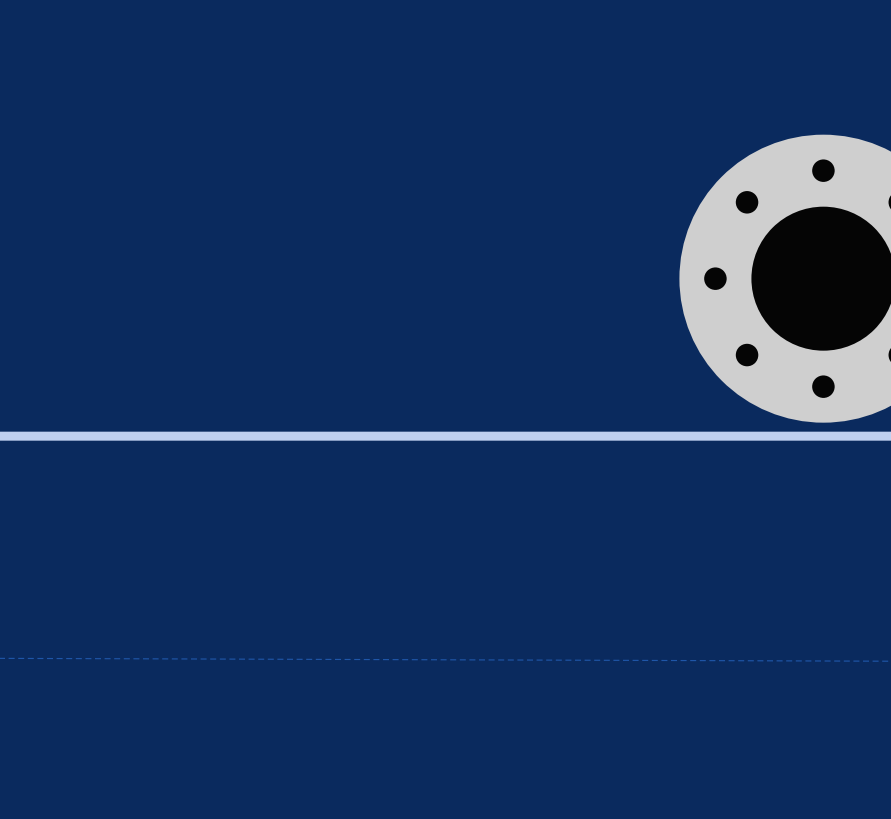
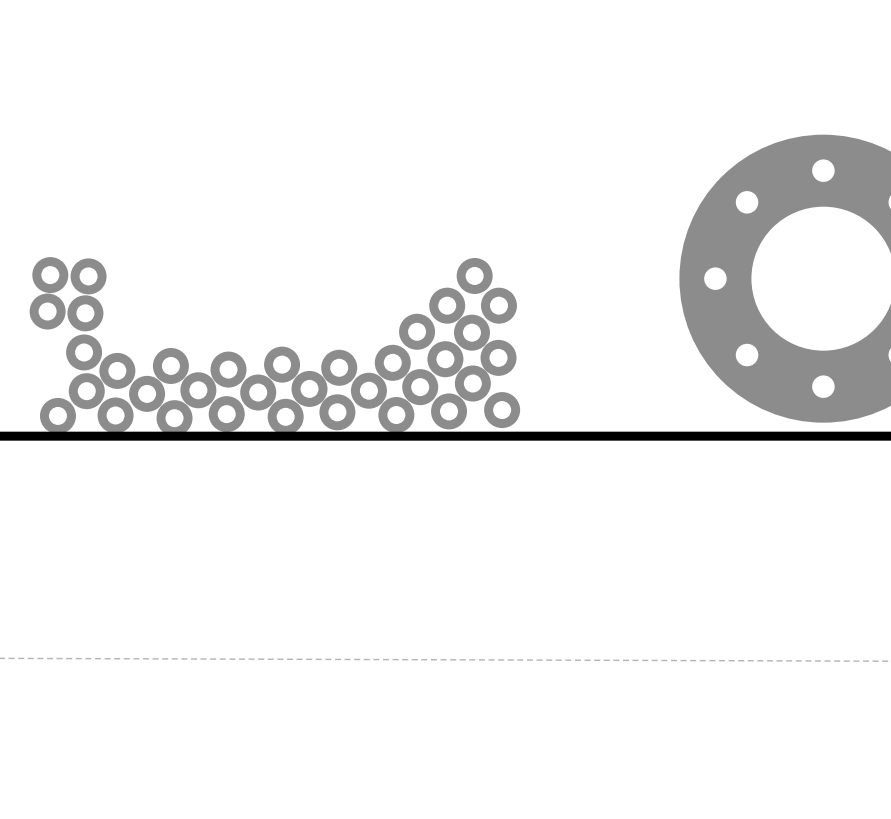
via: none -> (50, 275)
via: none -> (474, 275)
via: none -> (88, 276)
via: none -> (447, 305)
via: none -> (498, 305)
via: none -> (47, 311)
via: none -> (85, 313)
via: none -> (417, 331)
via: none -> (471, 332)
via: none -> (84, 352)
via: none -> (498, 357)
via: none -> (445, 359)
via: none -> (392, 362)
via: none -> (282, 364)
via: none -> (170, 365)
via: none -> (339, 367)
via: none -> (228, 369)
via: none -> (117, 370)
via: none -> (472, 383)
via: none -> (420, 387)
via: none -> (309, 388)
via: none -> (198, 390)
via: none -> (368, 390)
via: none -> (86, 391)
via: none -> (258, 392)
via: none -> (147, 393)
via: none -> (502, 410)
via: none -> (449, 411)
via: none -> (337, 412)
via: none -> (226, 414)
via: none -> (57, 415)
via: none -> (115, 415)
via: none -> (396, 415)
via: none -> (285, 416)
via: none -> (174, 418)

